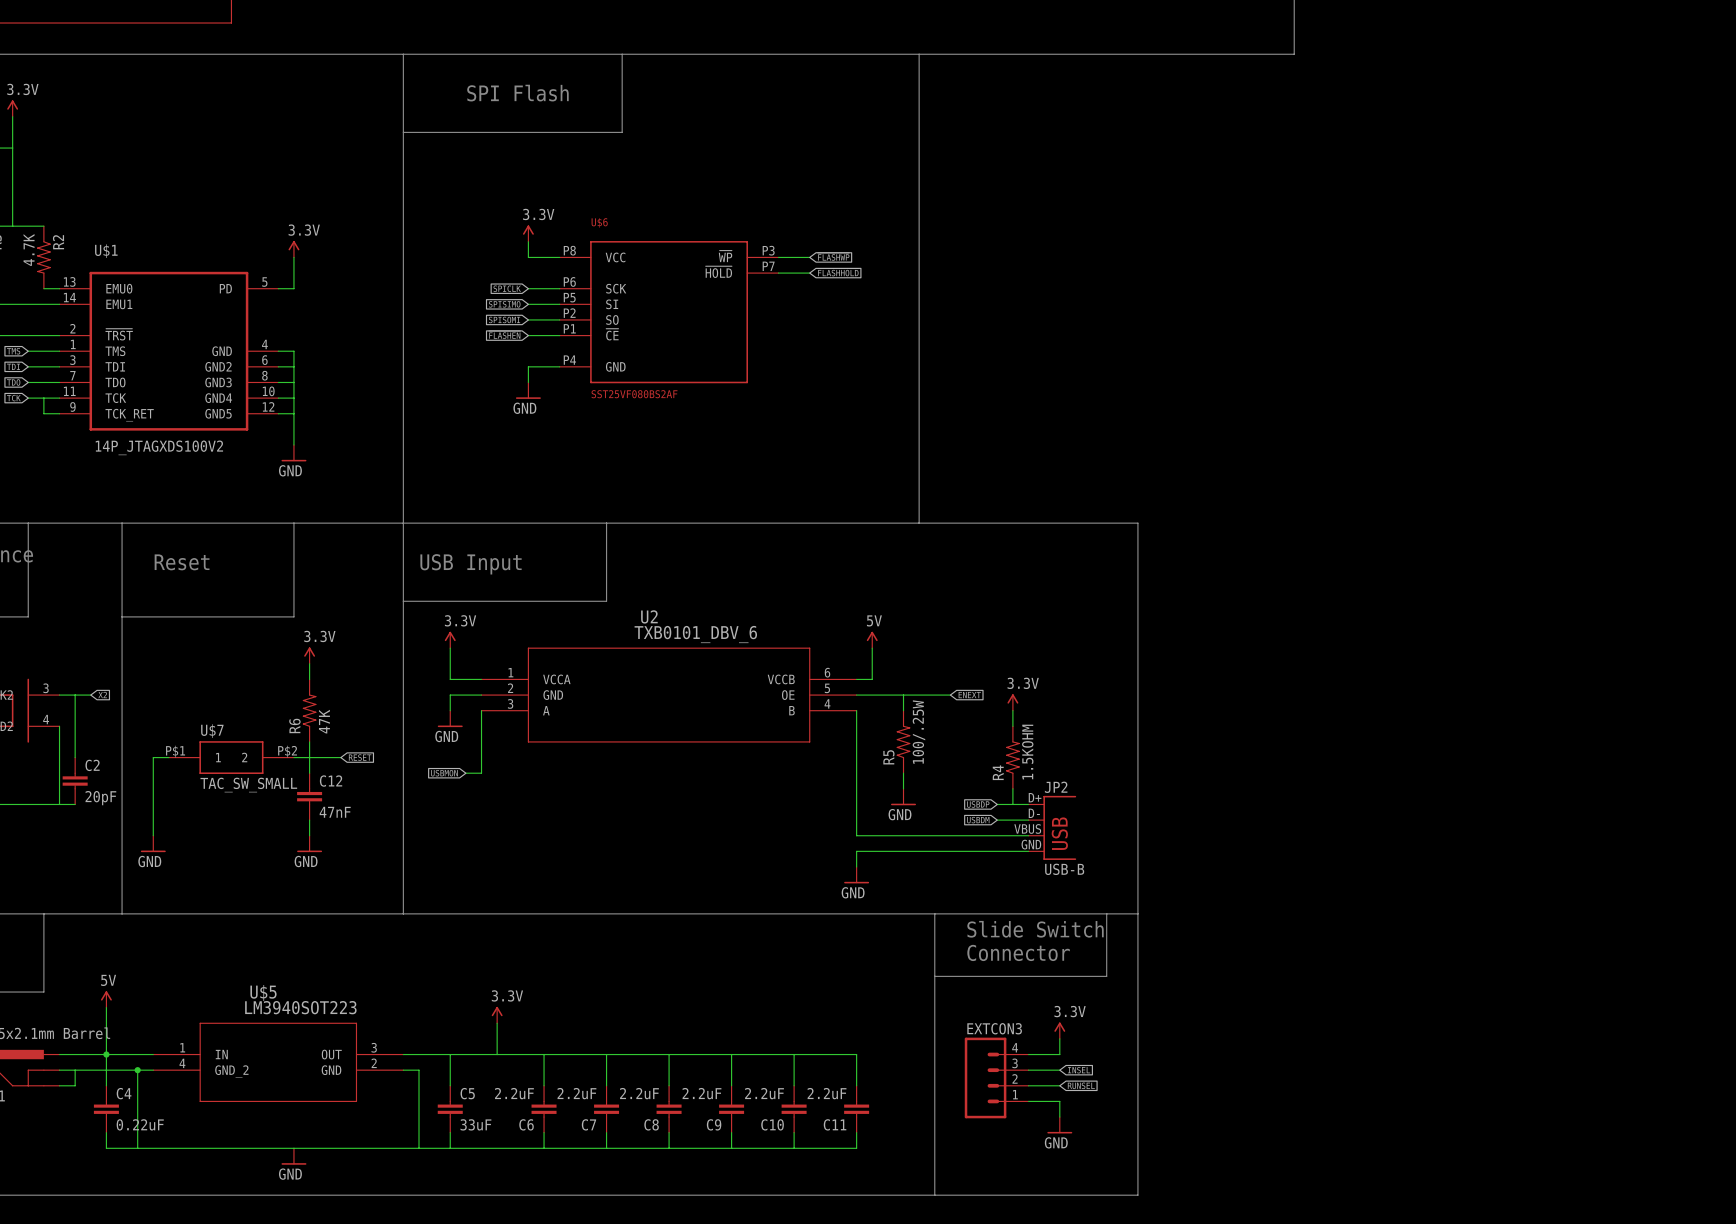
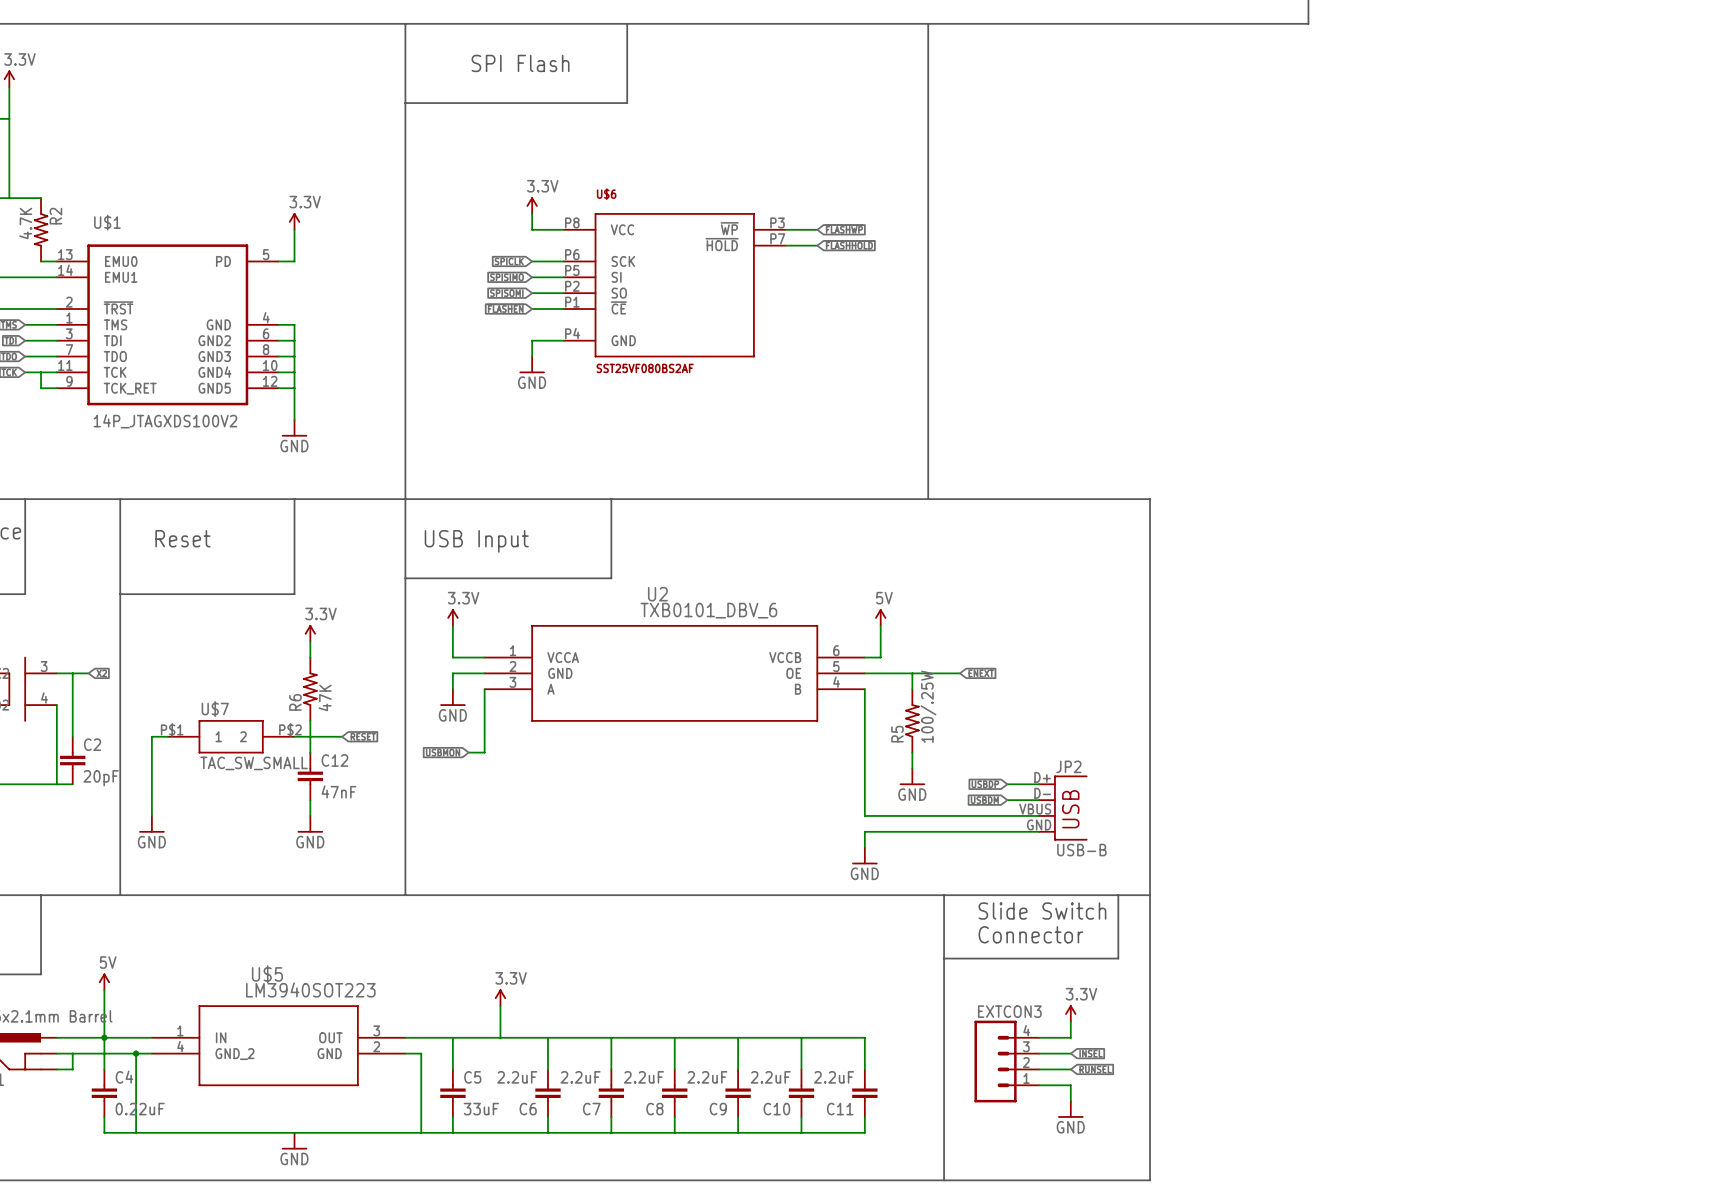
power symbol: 3.3V (1012, 702) -> none
wire: (1012, 710) (1012, 726) -> none
R4: 1.5KOHM (1012, 757) -> none
wire: (1012, 788) (1012, 804) -> none

